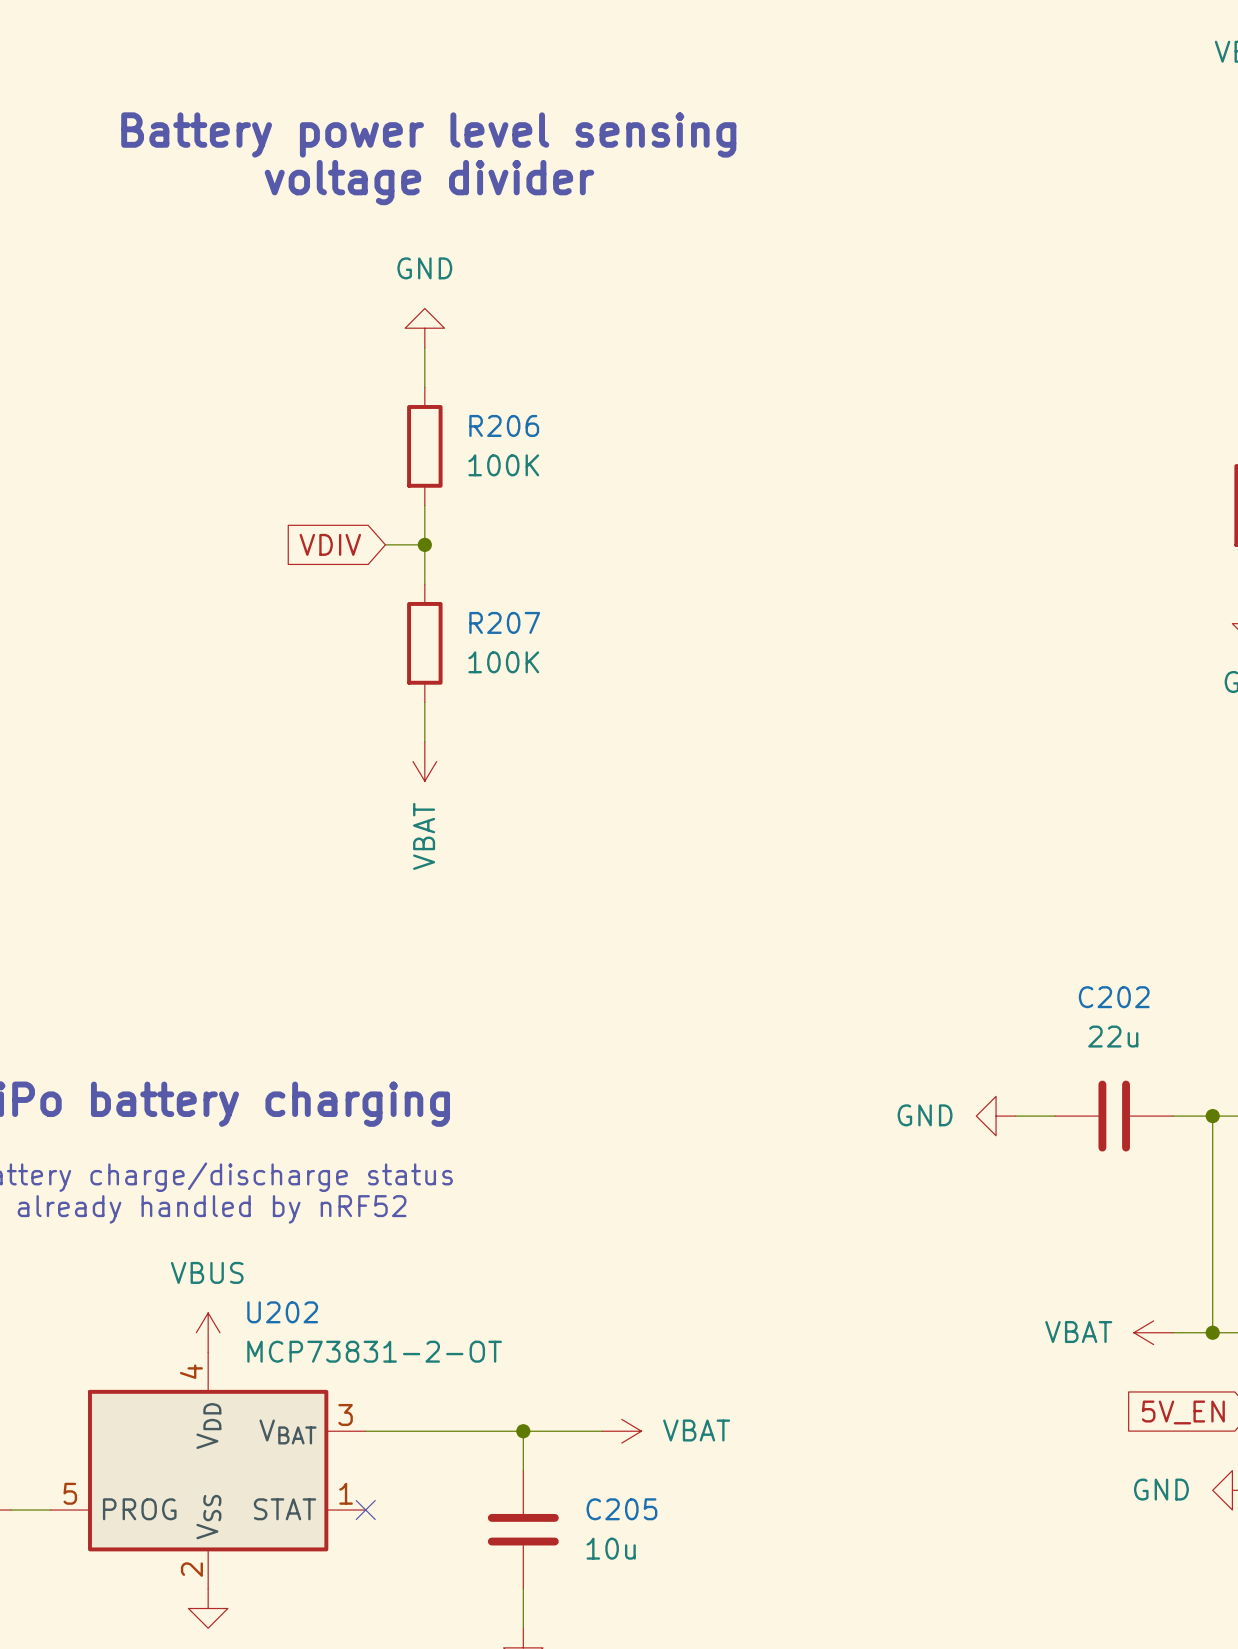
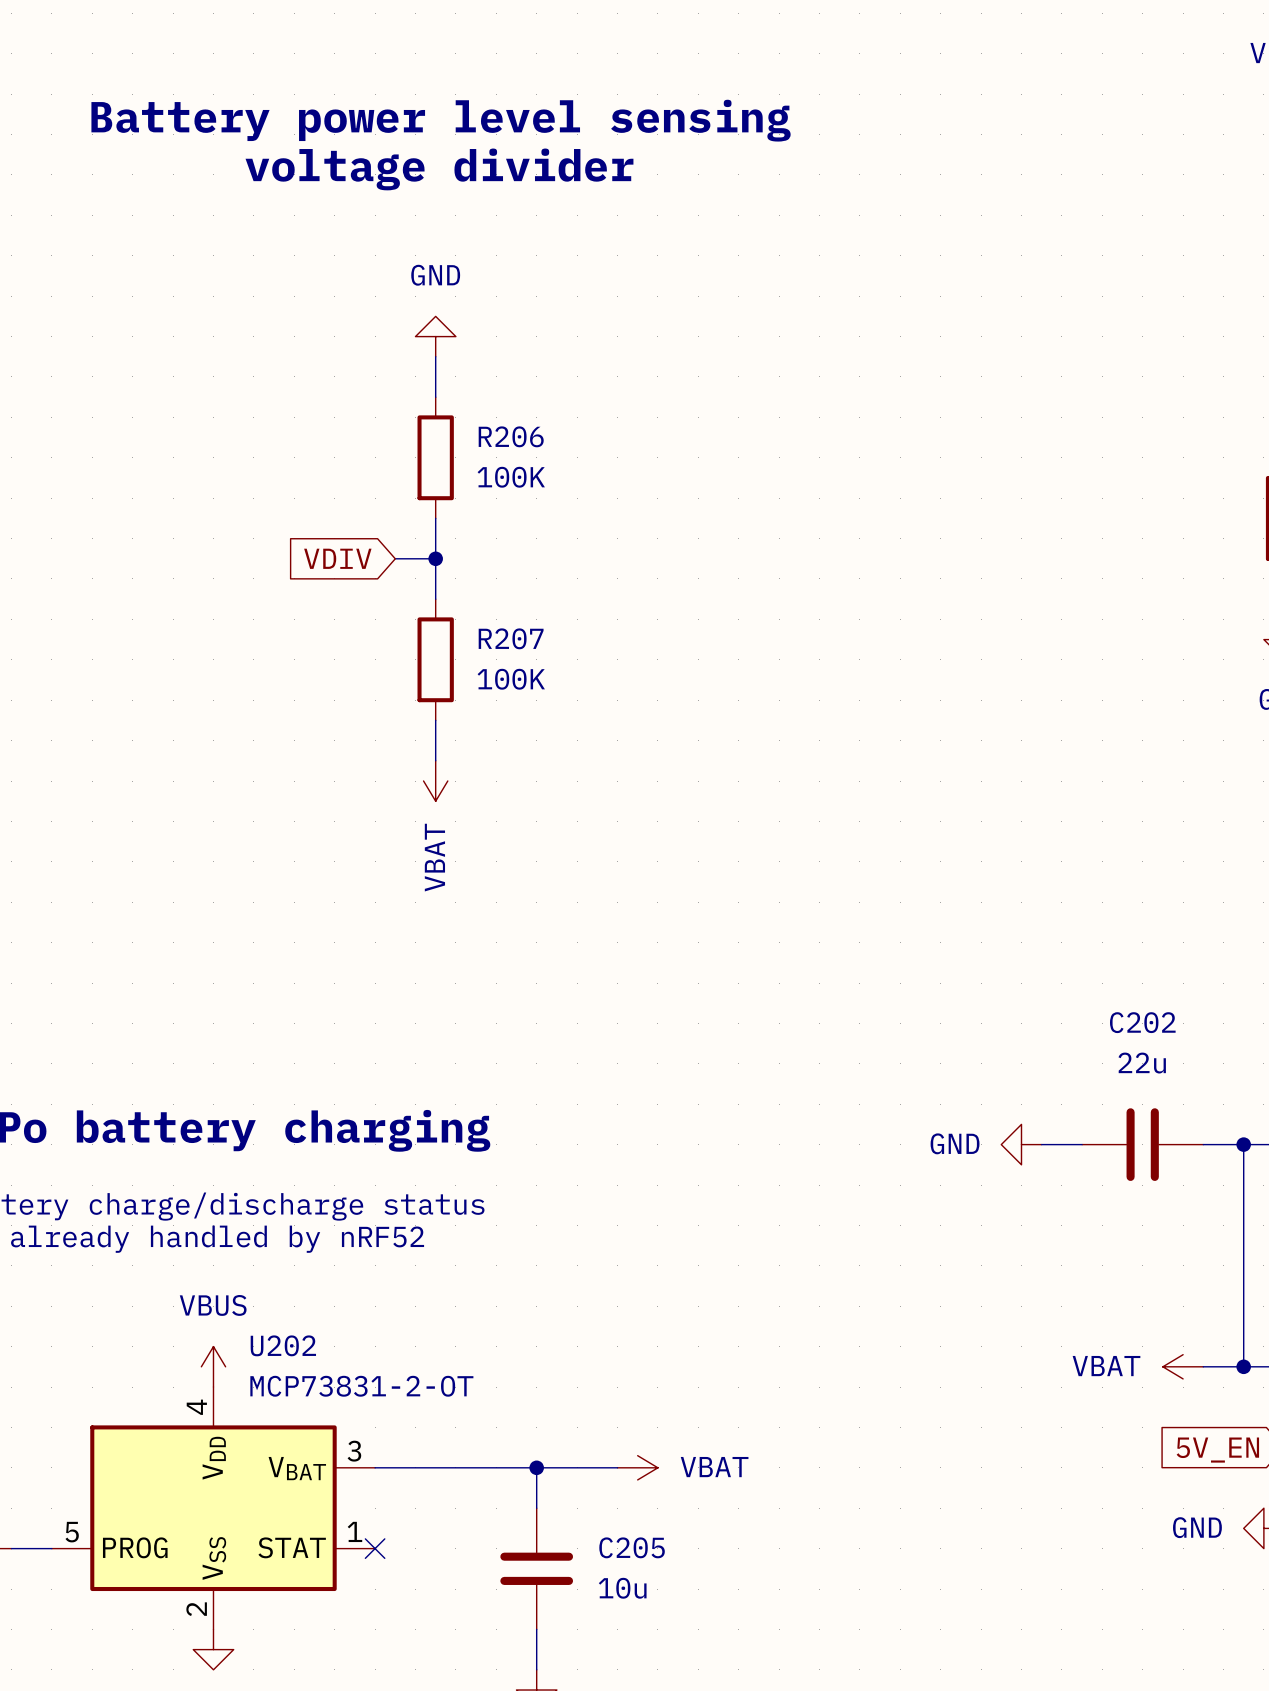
text position: Battery power level sensing (428, 134) -> Battery power level sensing (441, 120)
text position: voltage divider (429, 182) -> voltage divider (439, 169)

